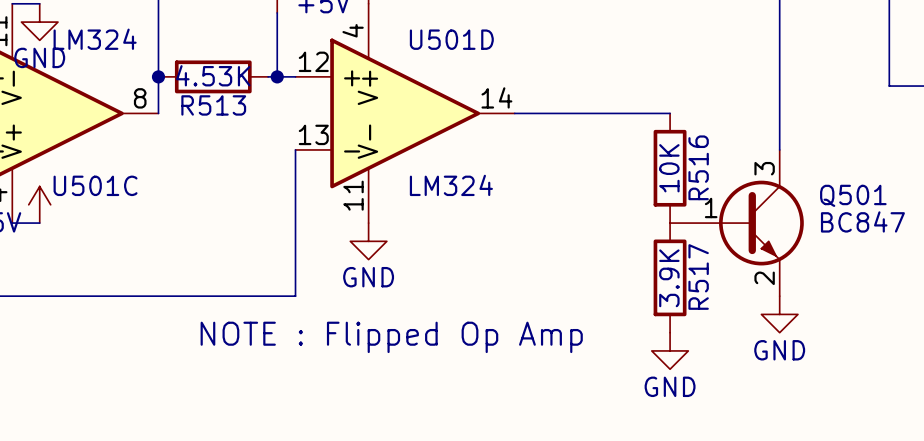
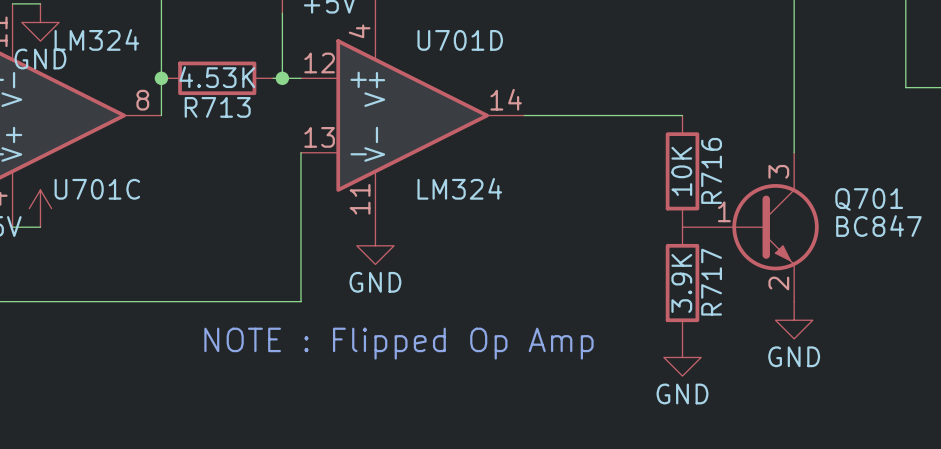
U501D name: U501D (451, 39) -> U701D (460, 40)
R513 name: R513 (213, 105) -> R713 (217, 107)
R516 name: R516 (698, 167) -> R716 (711, 170)
U501C name: U501C (95, 185) -> U701C (97, 189)
Q501 name: Q501 (853, 195) -> Q701 (869, 199)
R517 name: R517 (698, 277) -> R717 (711, 282)

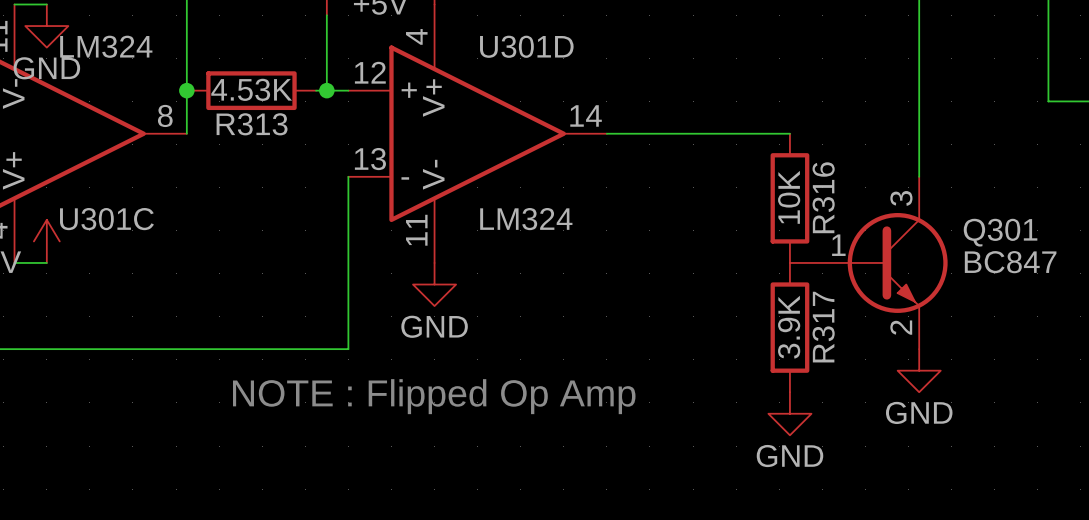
U701D name: U701D (460, 40) -> U301D (526, 46)
R713 name: R713 (217, 107) -> R313 (252, 124)
R716 name: R716 (711, 170) -> R316 (823, 197)
U701C name: U701C (97, 189) -> U301C (106, 219)
Q701 name: Q701 (869, 199) -> Q301 (1000, 232)
R717 name: R717 (711, 282) -> R317 (823, 327)

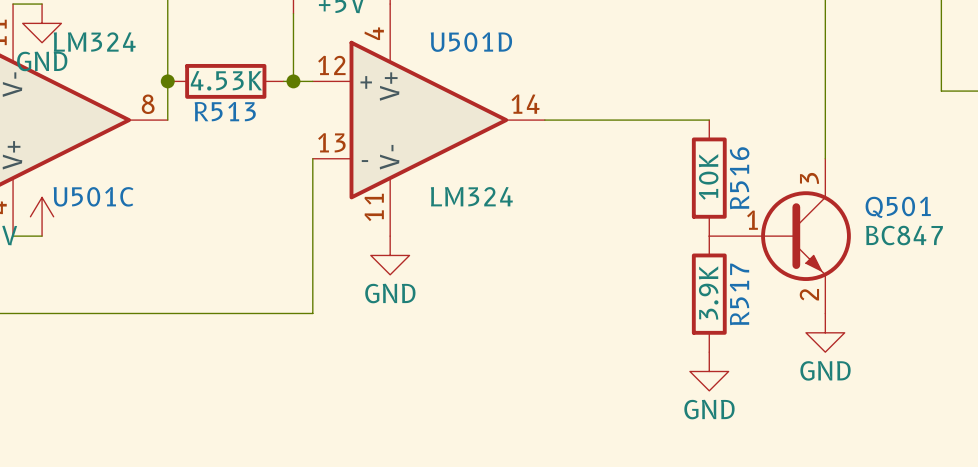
U301D name: U301D (526, 46) -> U501D (471, 42)
R313 name: R313 (252, 124) -> R513 (225, 111)
R316 name: R316 (823, 197) -> R516 (739, 178)
U301C name: U301C (106, 219) -> U501C (93, 196)
Q301 name: Q301 (1000, 232) -> Q501 (898, 207)
R317 name: R317 (823, 327) -> R517 (739, 294)
text: NOTE : Flipped Op Amp (434, 396) -> none

